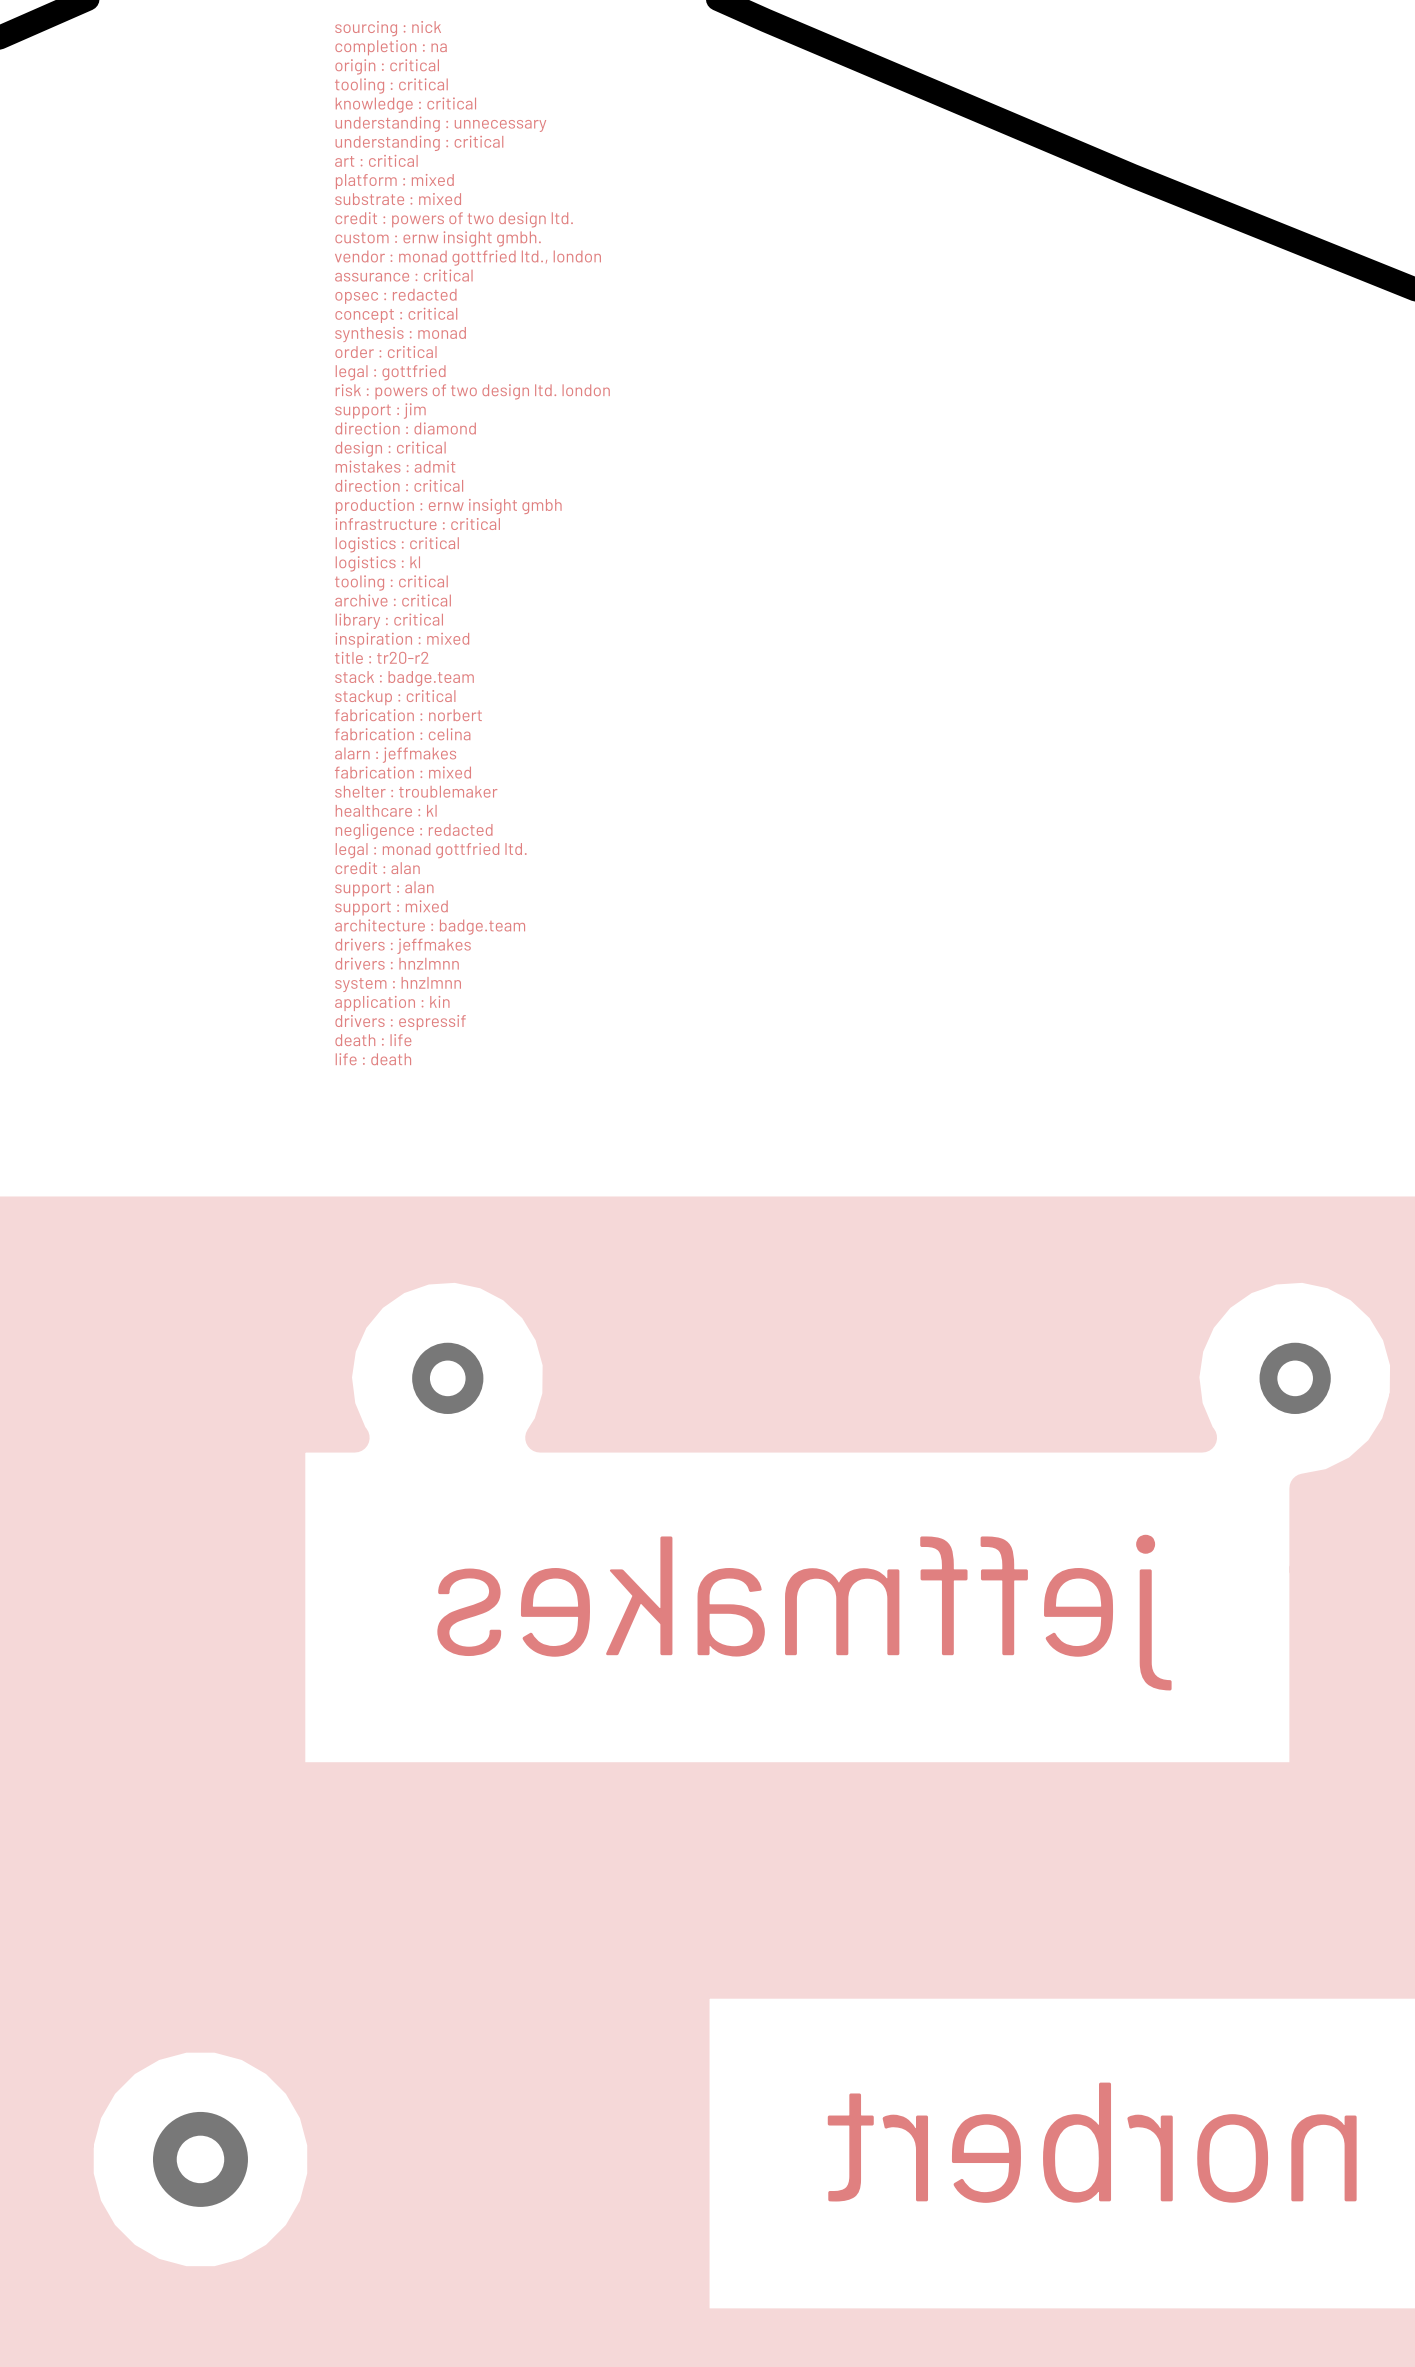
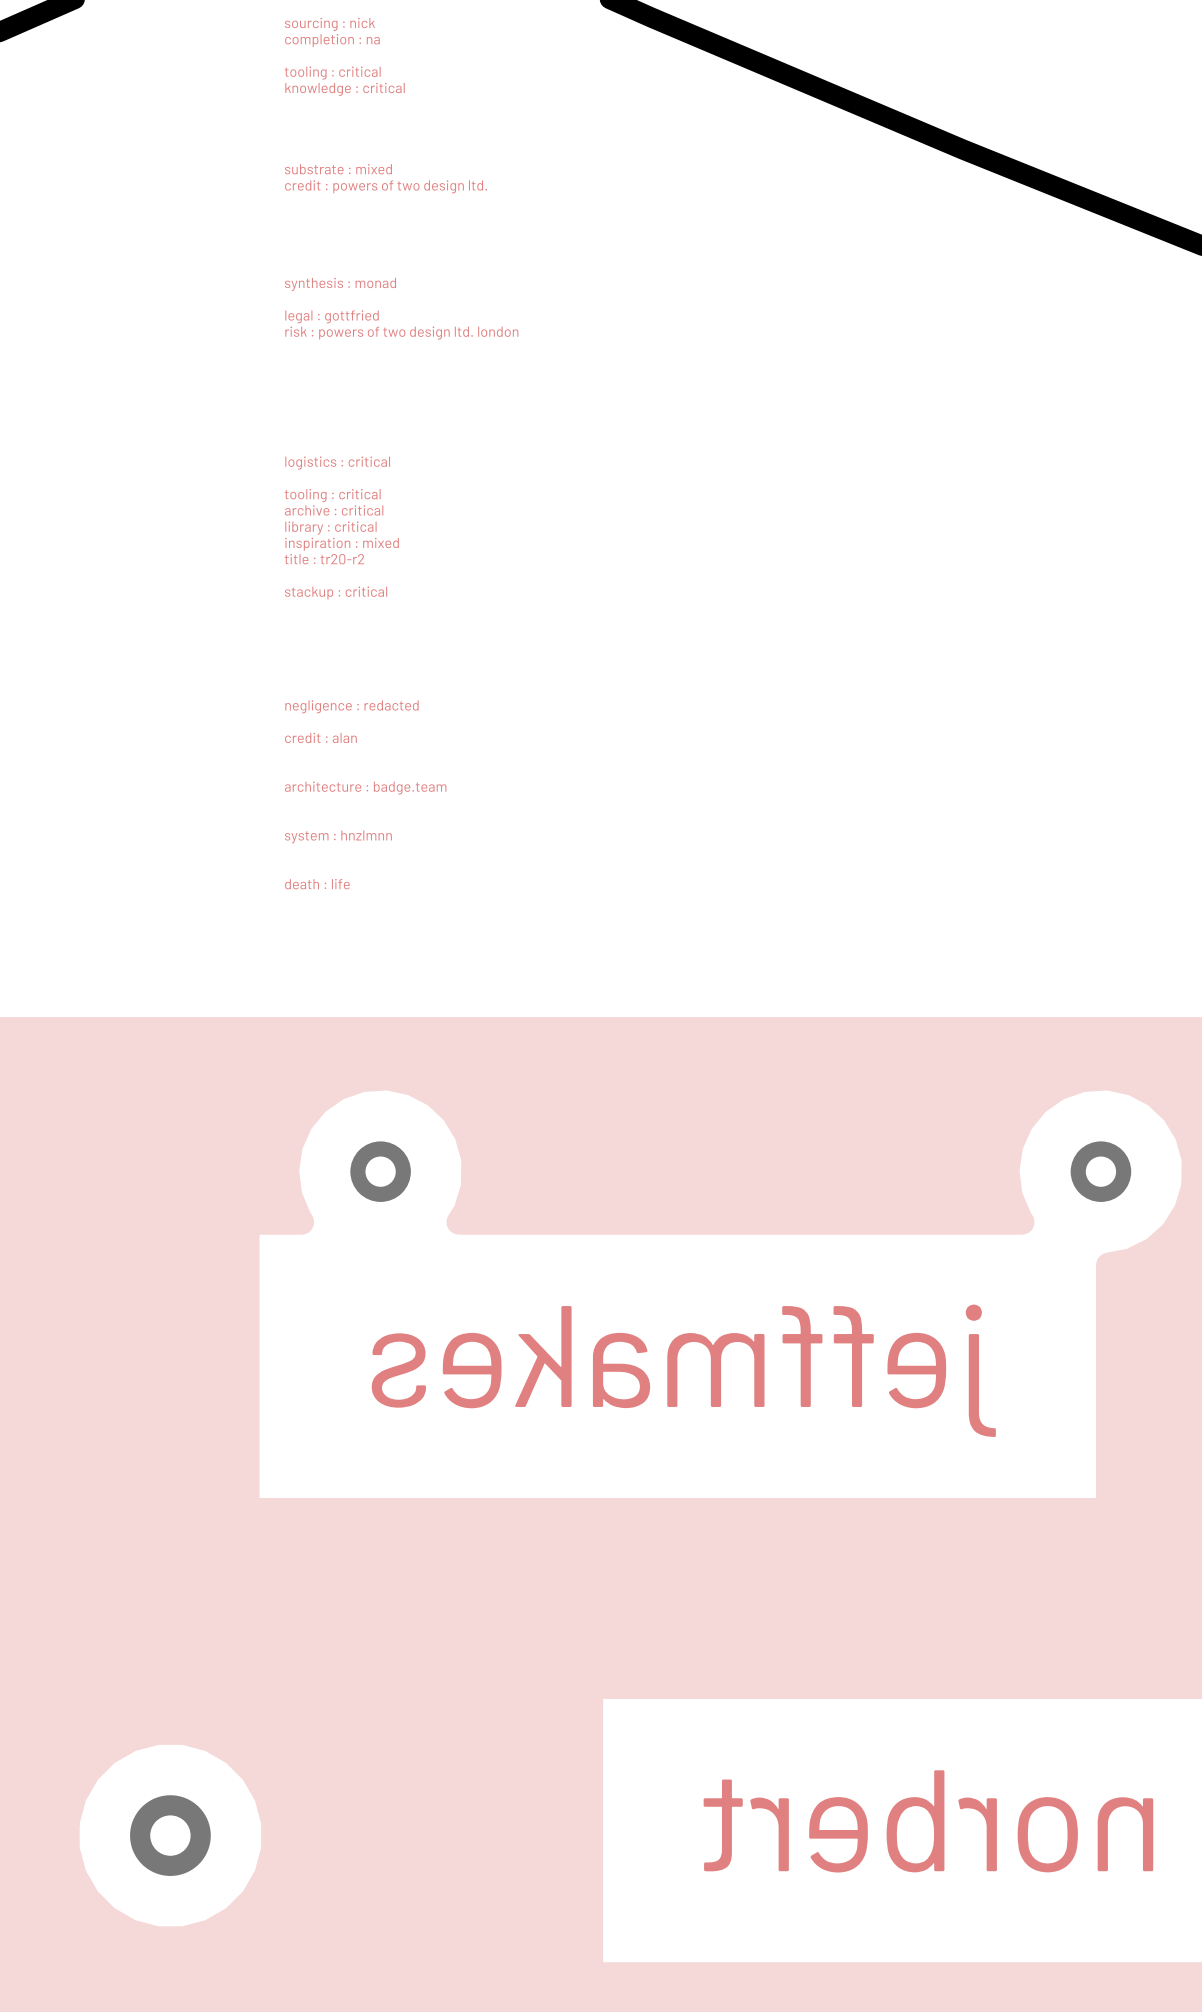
text: origin : critical (387, 66) -> none
text: understanding : unnecessary (440, 124) -> none
text: understanding : critical (419, 143) -> none
text: art : critical (376, 160) -> none
text: platform : mixed (394, 181) -> none
text: custom : ernw insight gmbh. (438, 238) -> none
text: vendor : monad gottfried ltd., london (467, 258) -> none
text: assurance : critical (403, 275) -> none
text: opsec : redacted (395, 296) -> none
text: concept : critical (396, 315) -> none
text: order : critical (385, 351) -> none
text: support : jim (380, 411) -> none
text: direction : diamond (405, 428) -> none
text: design : critical (390, 449) -> none
text: mistakes : admit (395, 466) -> none
text: direction : critical (399, 485) -> none
text: production : ernw insight gmbh (448, 506) -> none
text: infrastructure : critical (417, 524) -> none
text: logistics : kl (377, 563) -> none
text: stack : badge.team (404, 678) -> none
text: fabrication : norbert (408, 715) -> none
text: fabrication : celina (402, 734) -> none
text: alarn : jeffmakes (395, 755) -> none
text: fabrication : mixed (402, 772) -> none
text: shelter : troublemaker (416, 791) -> none
text: healthcare : kl (386, 810) -> none
text: legal : monad gottfried ltd. (431, 850) -> none
text: support : alan (384, 888) -> none
text: support : mixed (391, 907) -> none
text: drivers : jeffmakes (403, 946) -> none
text: drivers : hnzlmnn (397, 963) -> none
text: application : kin (392, 1003) -> none
text: drivers : espressif (400, 1022) -> none
text: life : death (373, 1059) -> none

